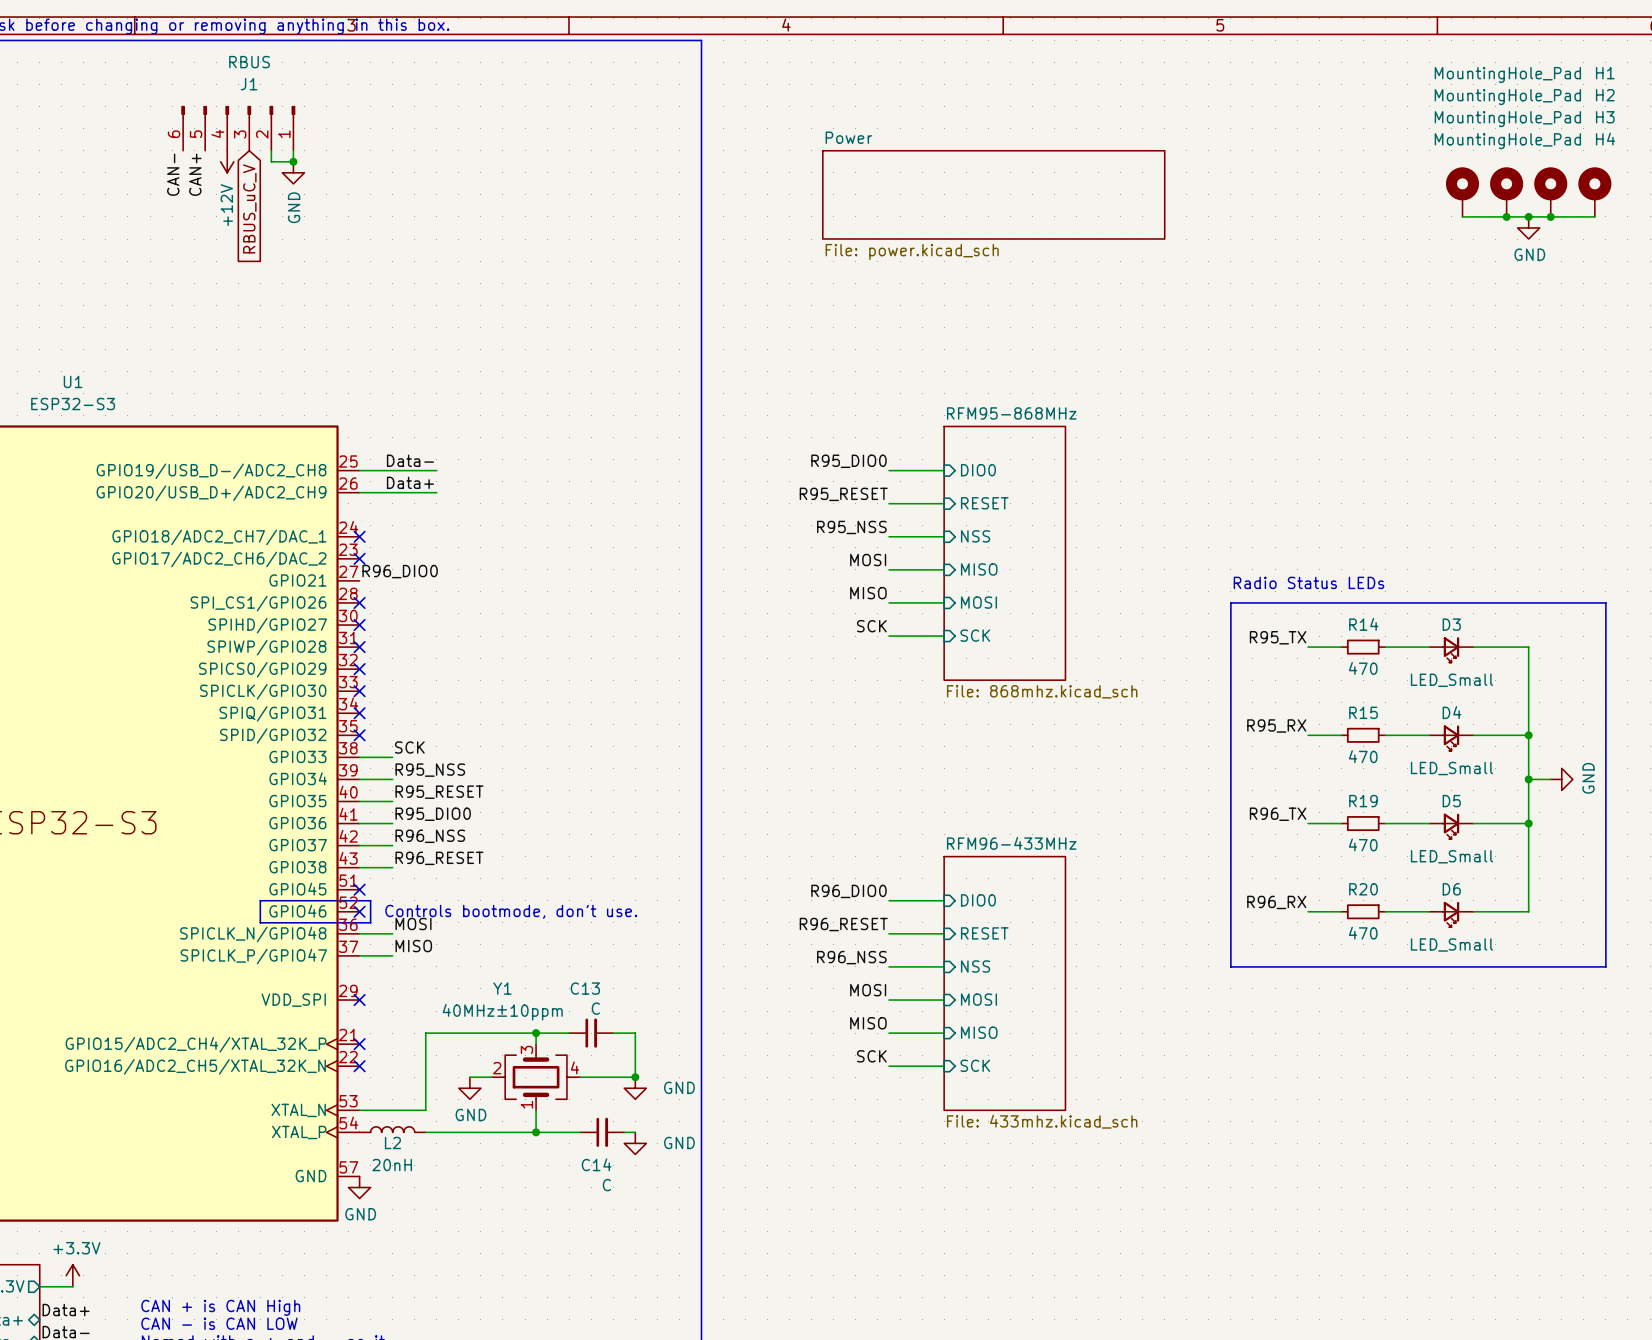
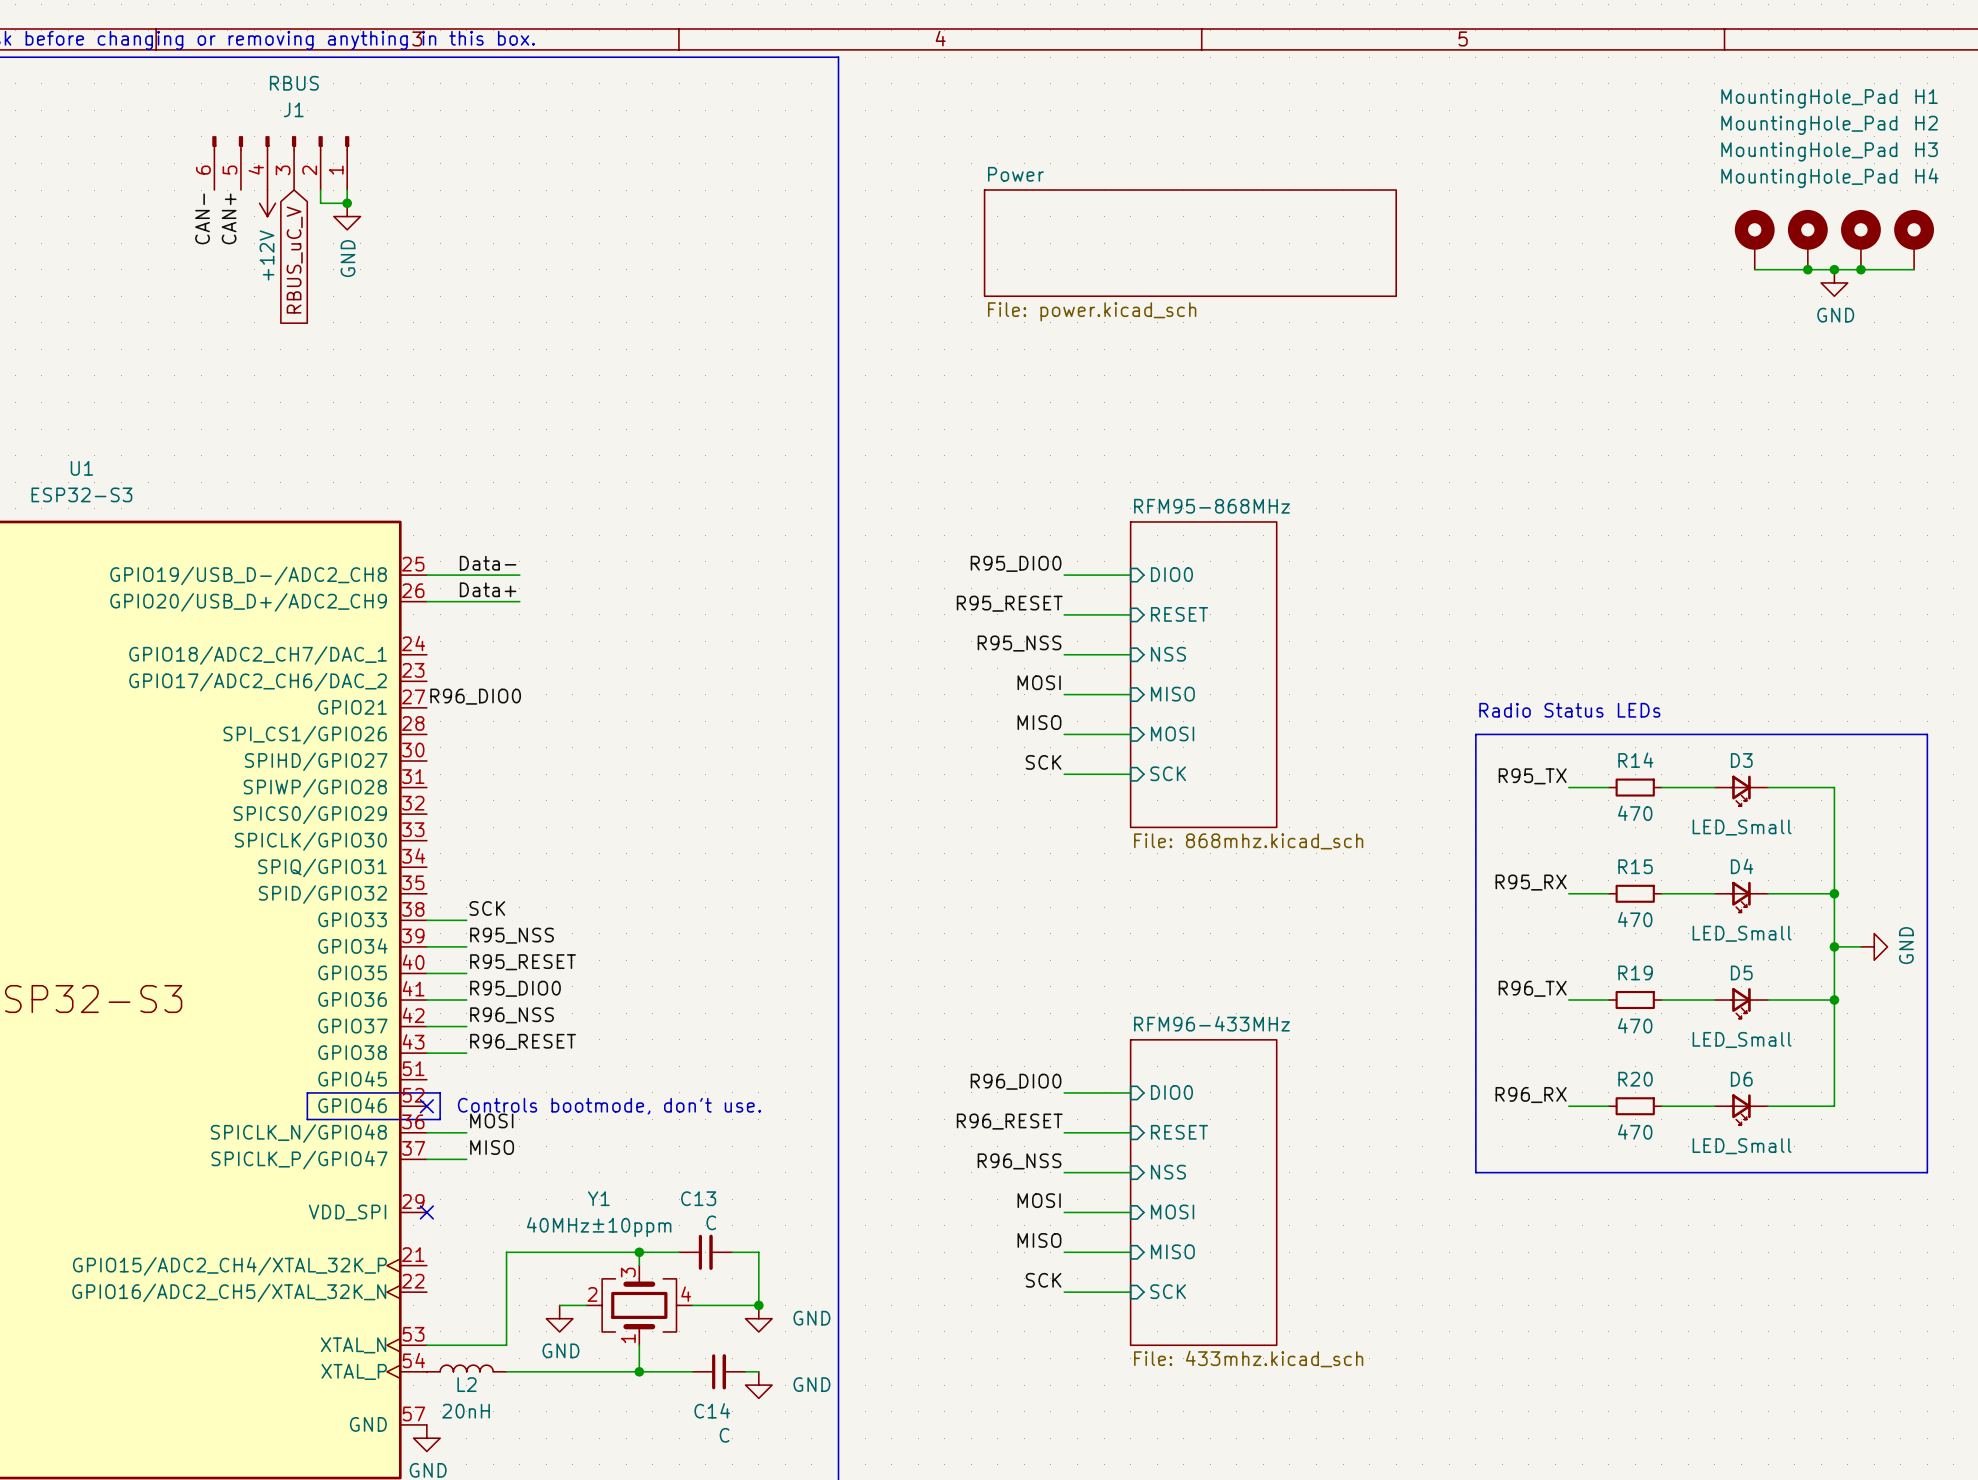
no-connect mark: (359, 536) -> none
no-connect mark: (359, 558) -> none
no-connect mark: (359, 602) -> none
no-connect mark: (359, 625) -> none
no-connect mark: (359, 647) -> none
no-connect mark: (359, 669) -> none
no-connect mark: (359, 691) -> none
no-connect mark: (359, 713) -> none
no-connect mark: (359, 735) -> none
no-connect mark: (359, 889) -> none
no-connect mark: (359, 1044) -> none
no-connect mark: (359, 1066) -> none

